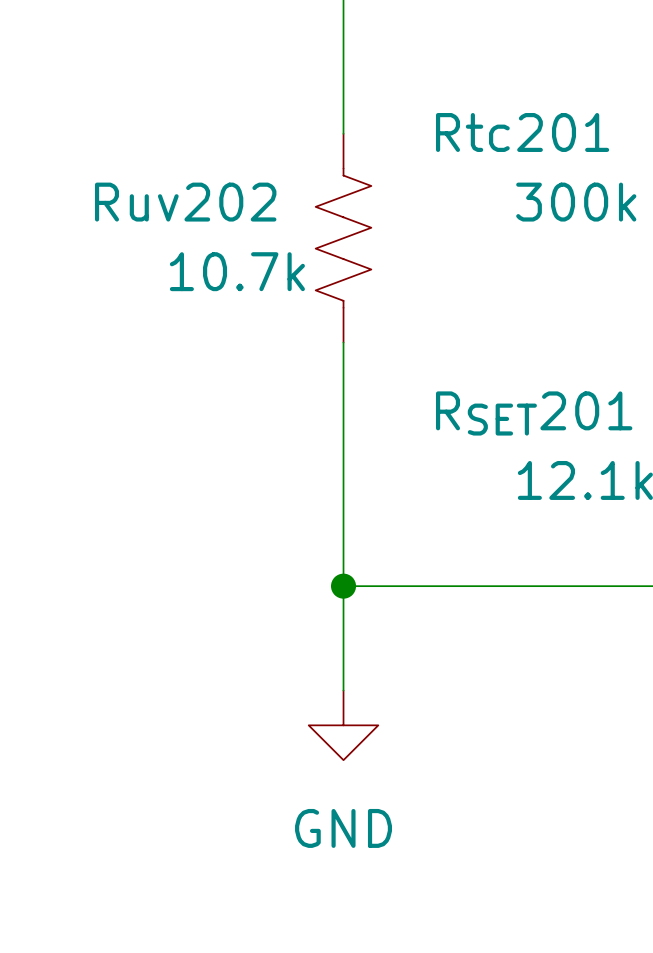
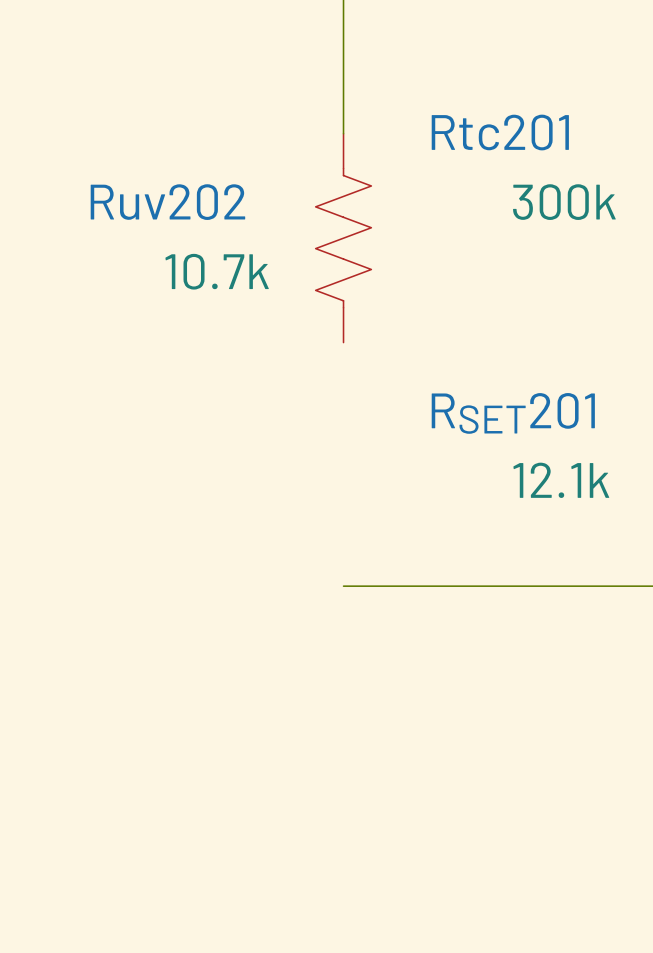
wire: (343, 342) (343, 690) -> none
junction: (343, 586) -> none
power symbol: GND (343, 725) -> none

